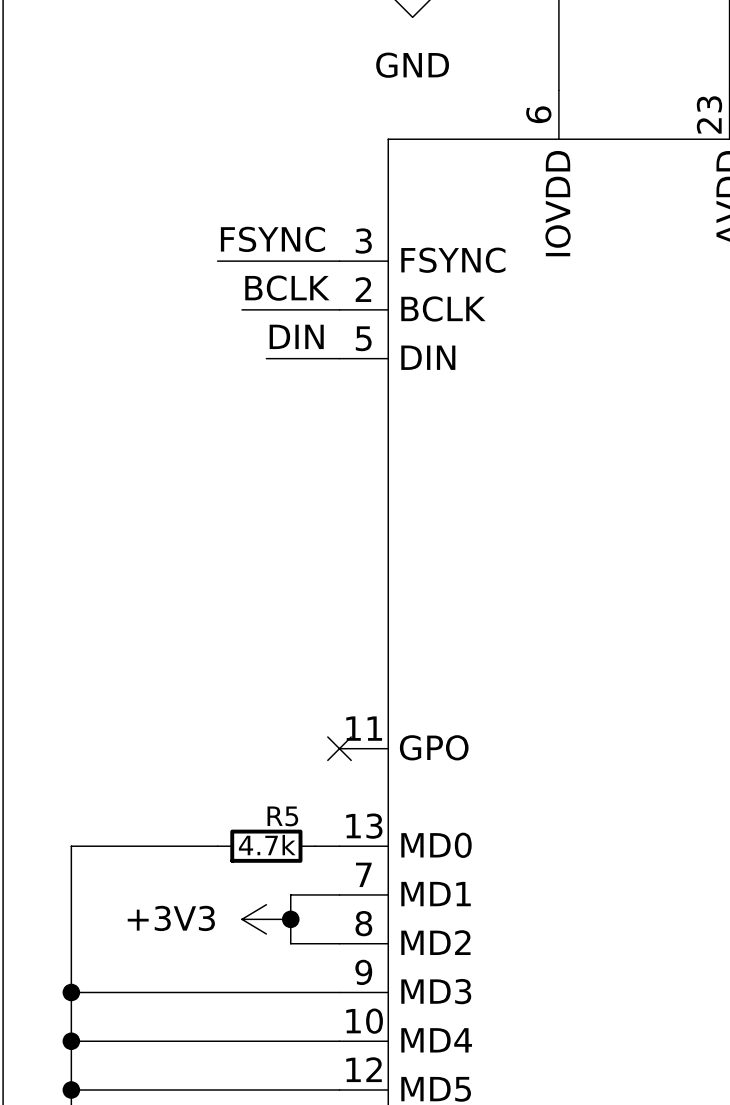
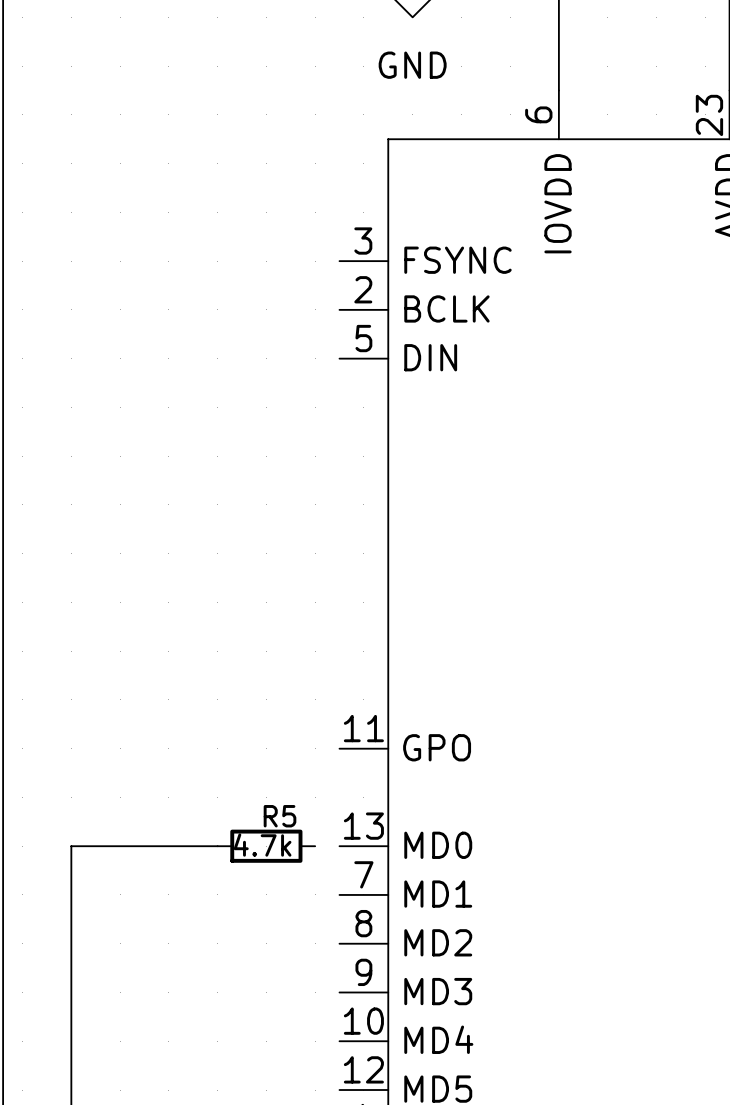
label: FSYNC (272, 239) -> none
wire: (217, 261) (339, 261) -> none
label: BCLK (287, 288) -> none
wire: (241, 309) (339, 309) -> none
label: DIN (296, 336) -> none
wire: (266, 358) (339, 358) -> none
no-connect mark: (339, 748) -> none
wire: (315, 846) (339, 846) -> none
wire: (339, 894) (290, 894) (290, 943) (339, 943) -> none
power symbol: +3V3 (266, 919) -> none
junction: (290, 919) -> none
wire: (71, 992) (339, 992) -> none
junction: (71, 992) -> none
wire: (71, 1041) (339, 1041) -> none
junction: (71, 1041) -> none
wire: (71, 1090) (339, 1090) -> none
junction: (71, 1090) -> none

